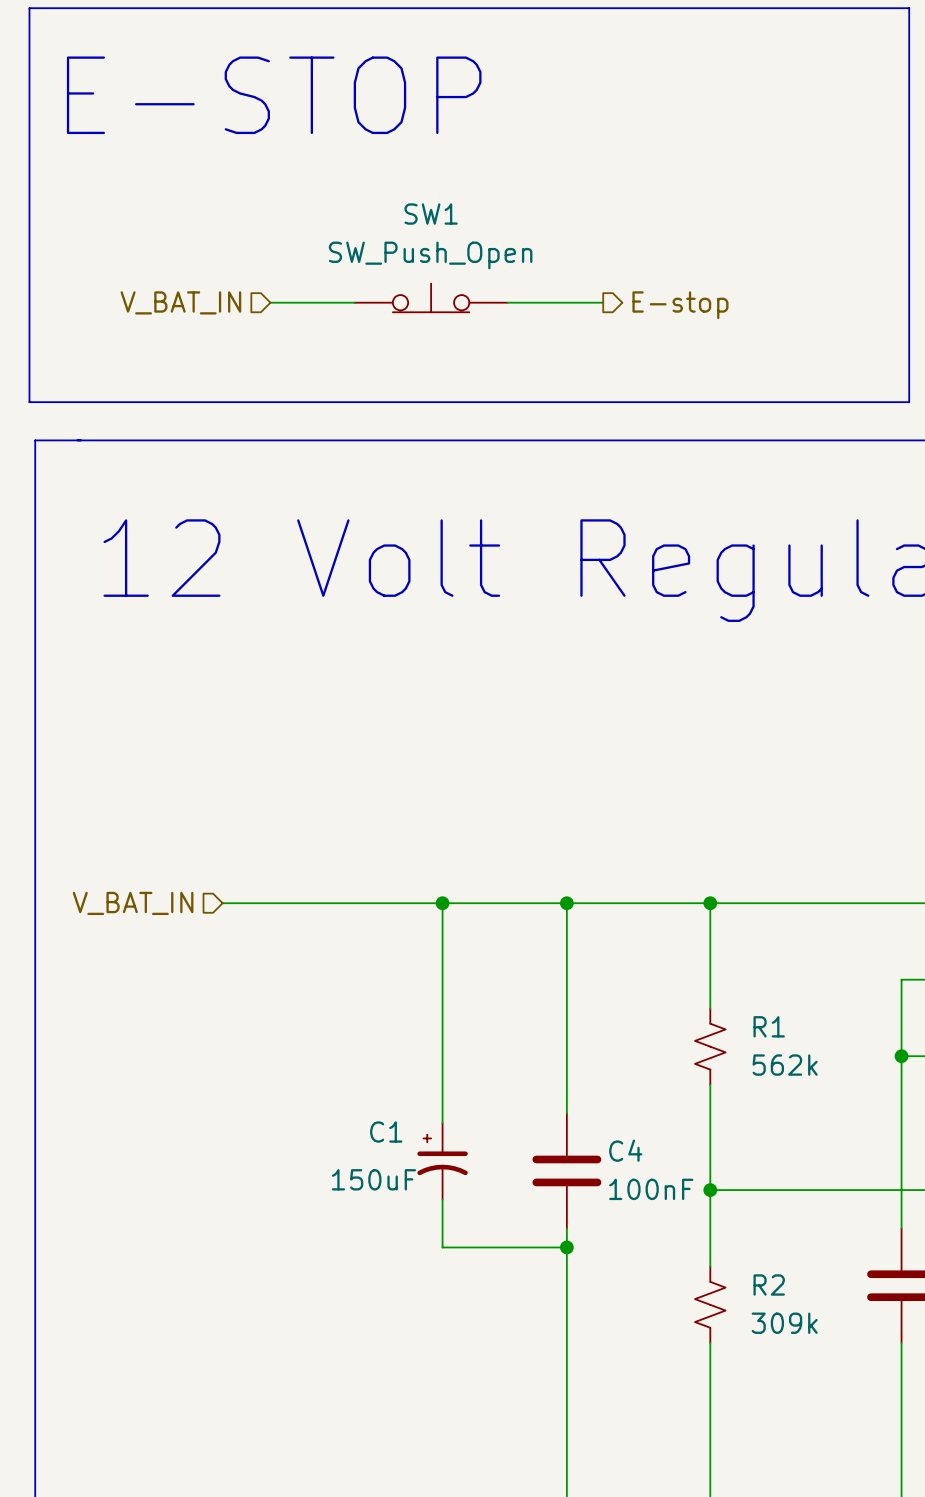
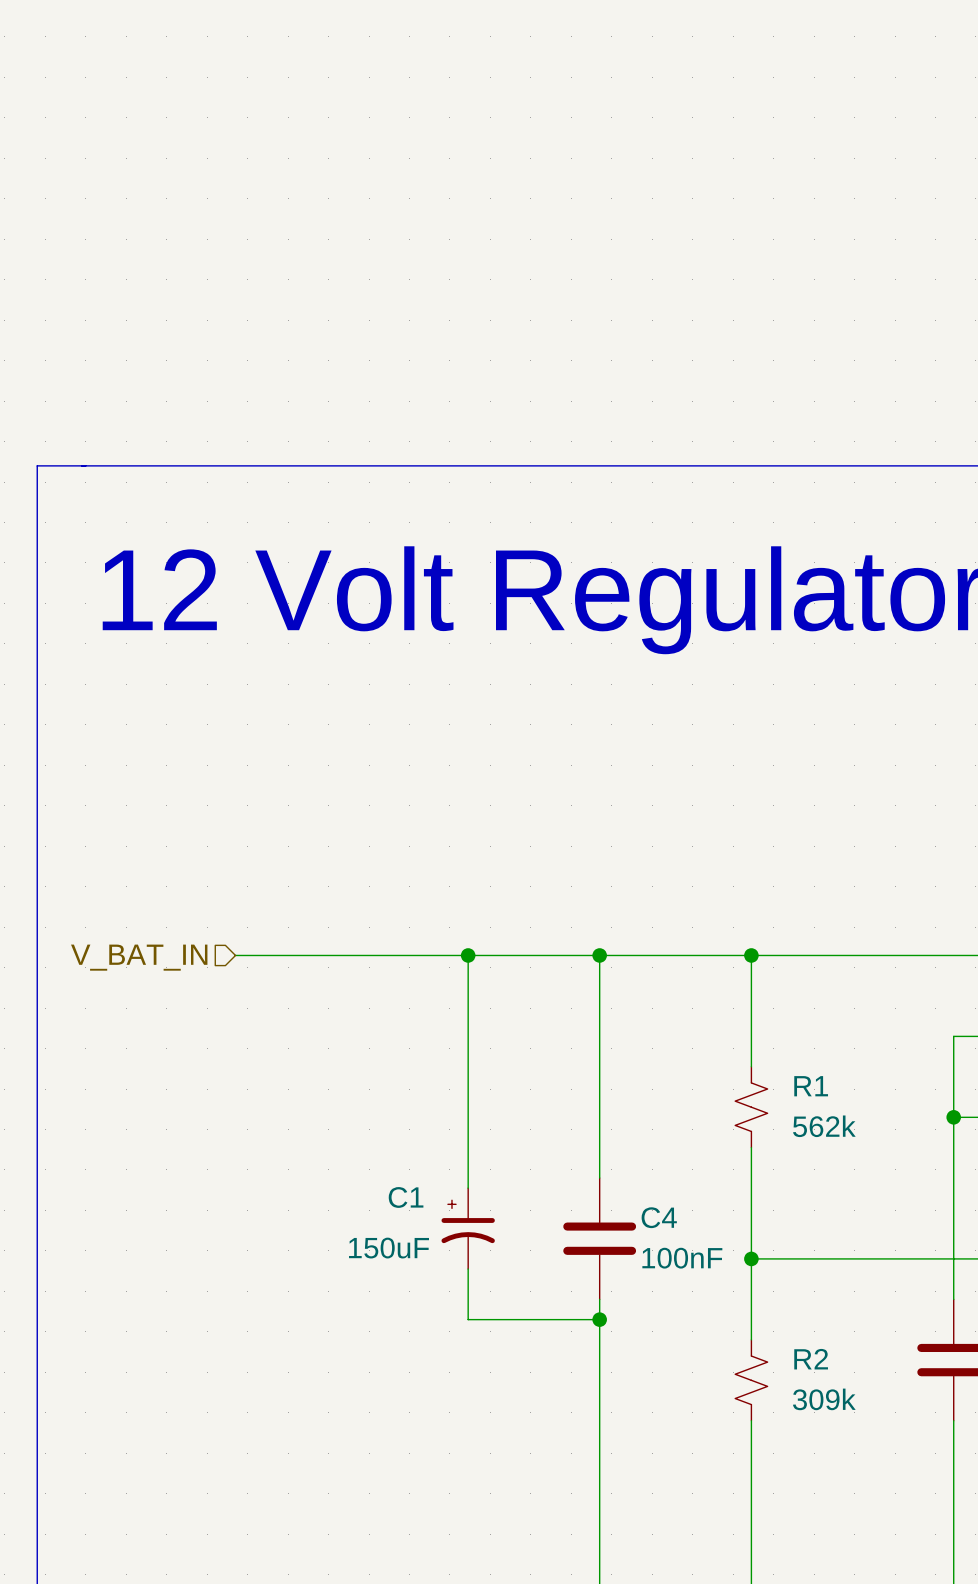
line: (29, 8) (909, 8) (909, 402) (29, 402) (29, 8) -> none
text: E-STOP (274, 95) -> none
SW1: SW_Push_Open (431, 297) -> none
hierarchical label: V_BAT_IN (180, 302) -> none
wire: (270, 302) (354, 302) -> none
wire: (507, 302) (603, 302) -> none
hierarchical label: E-stop (680, 305) -> none

